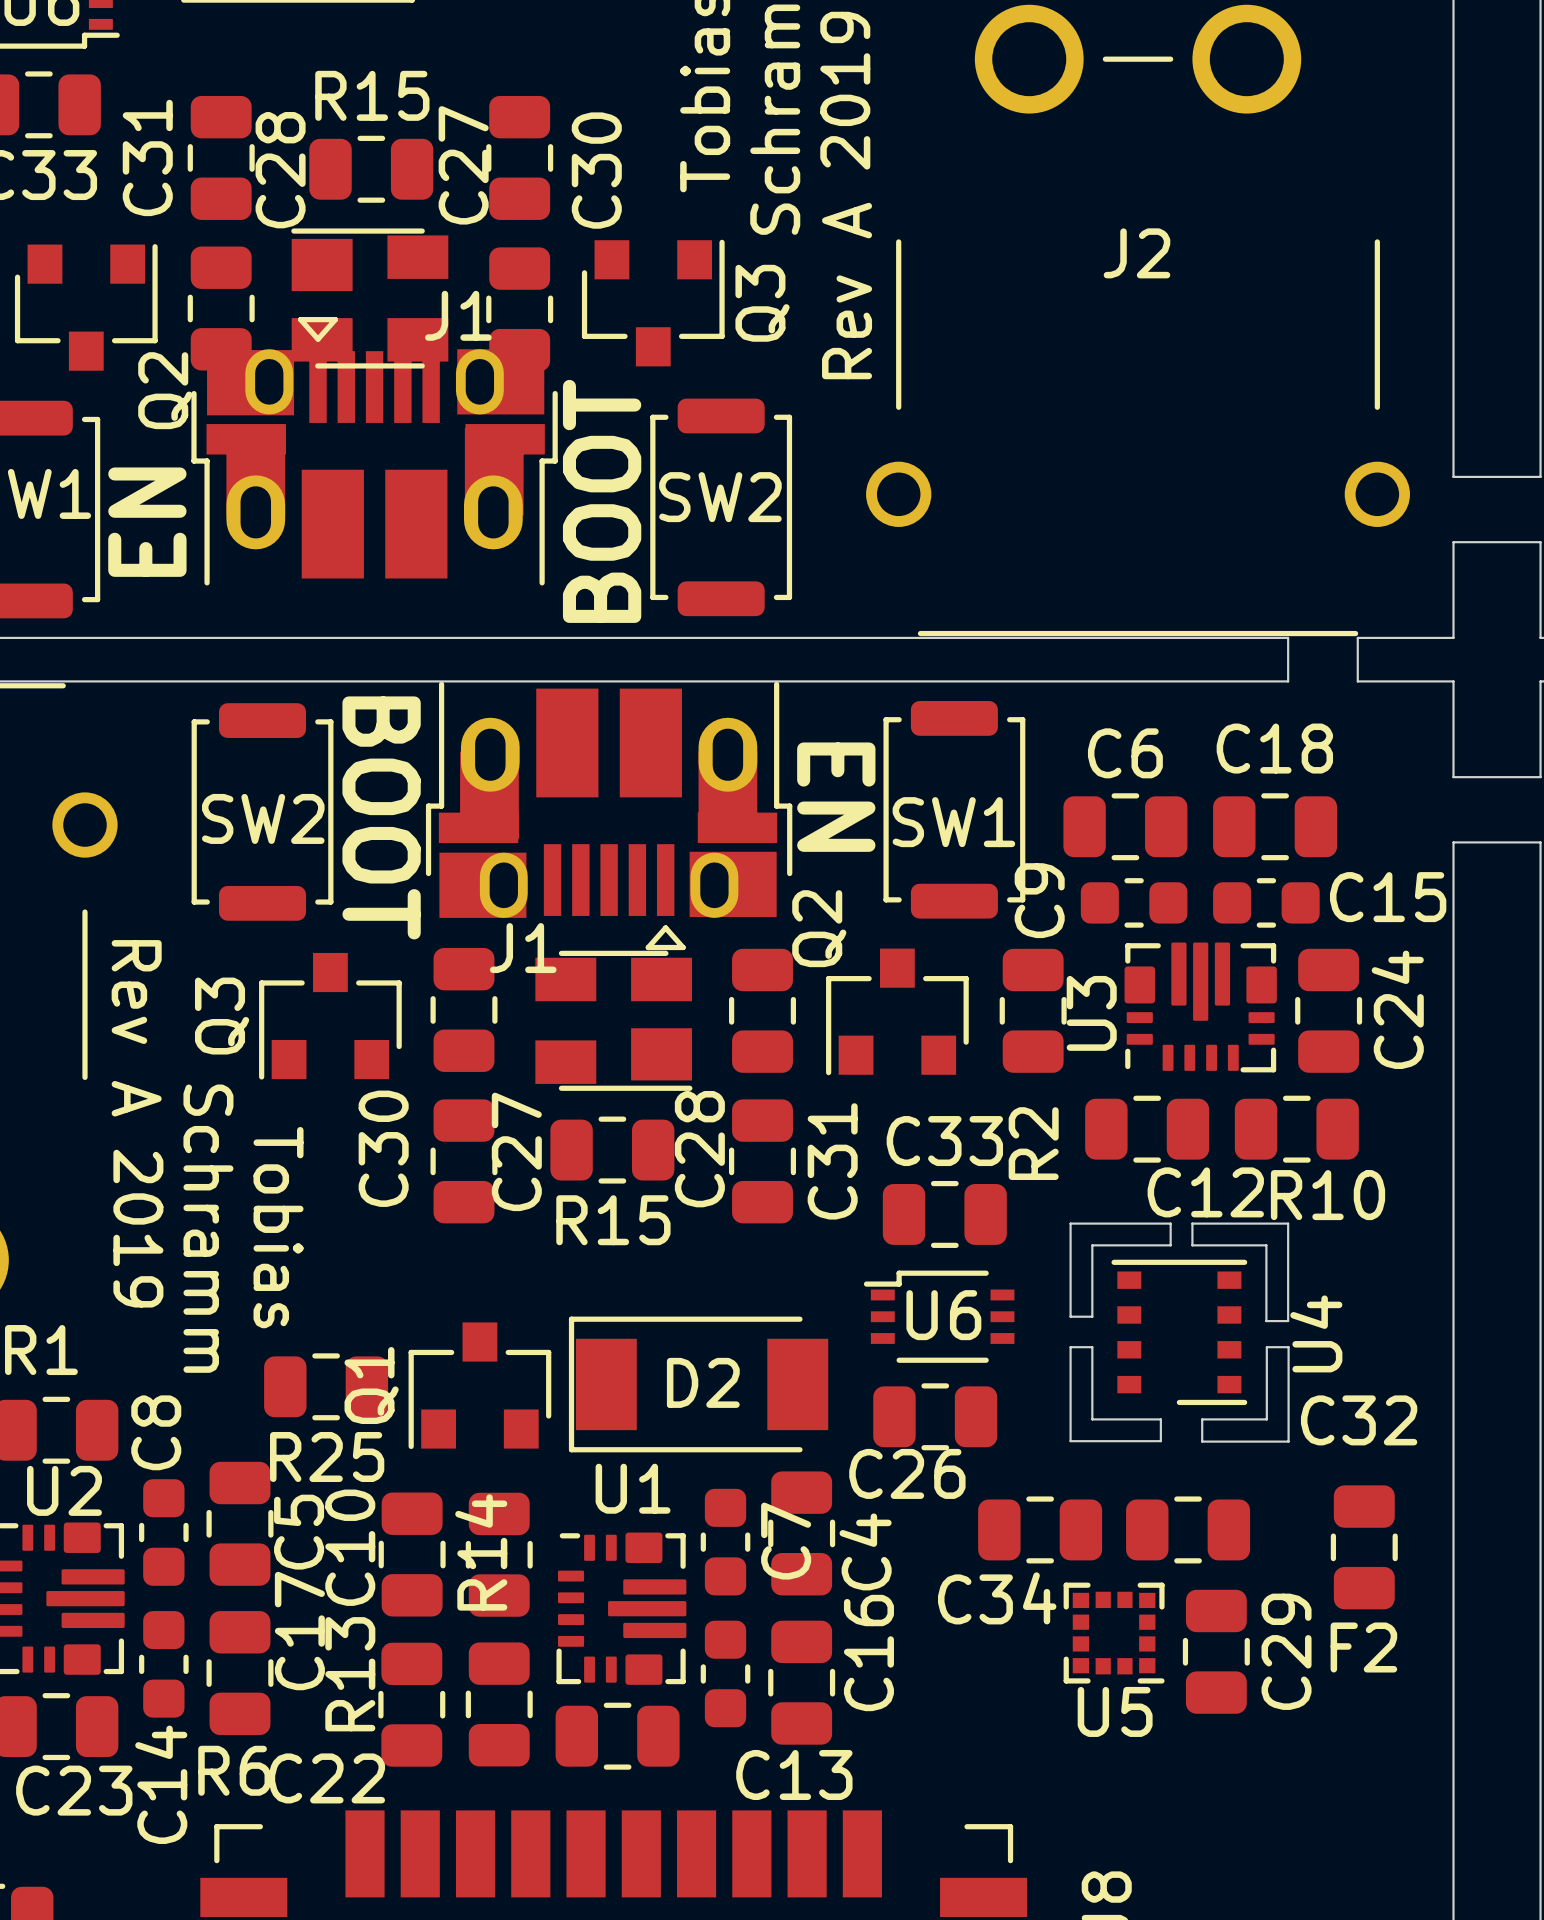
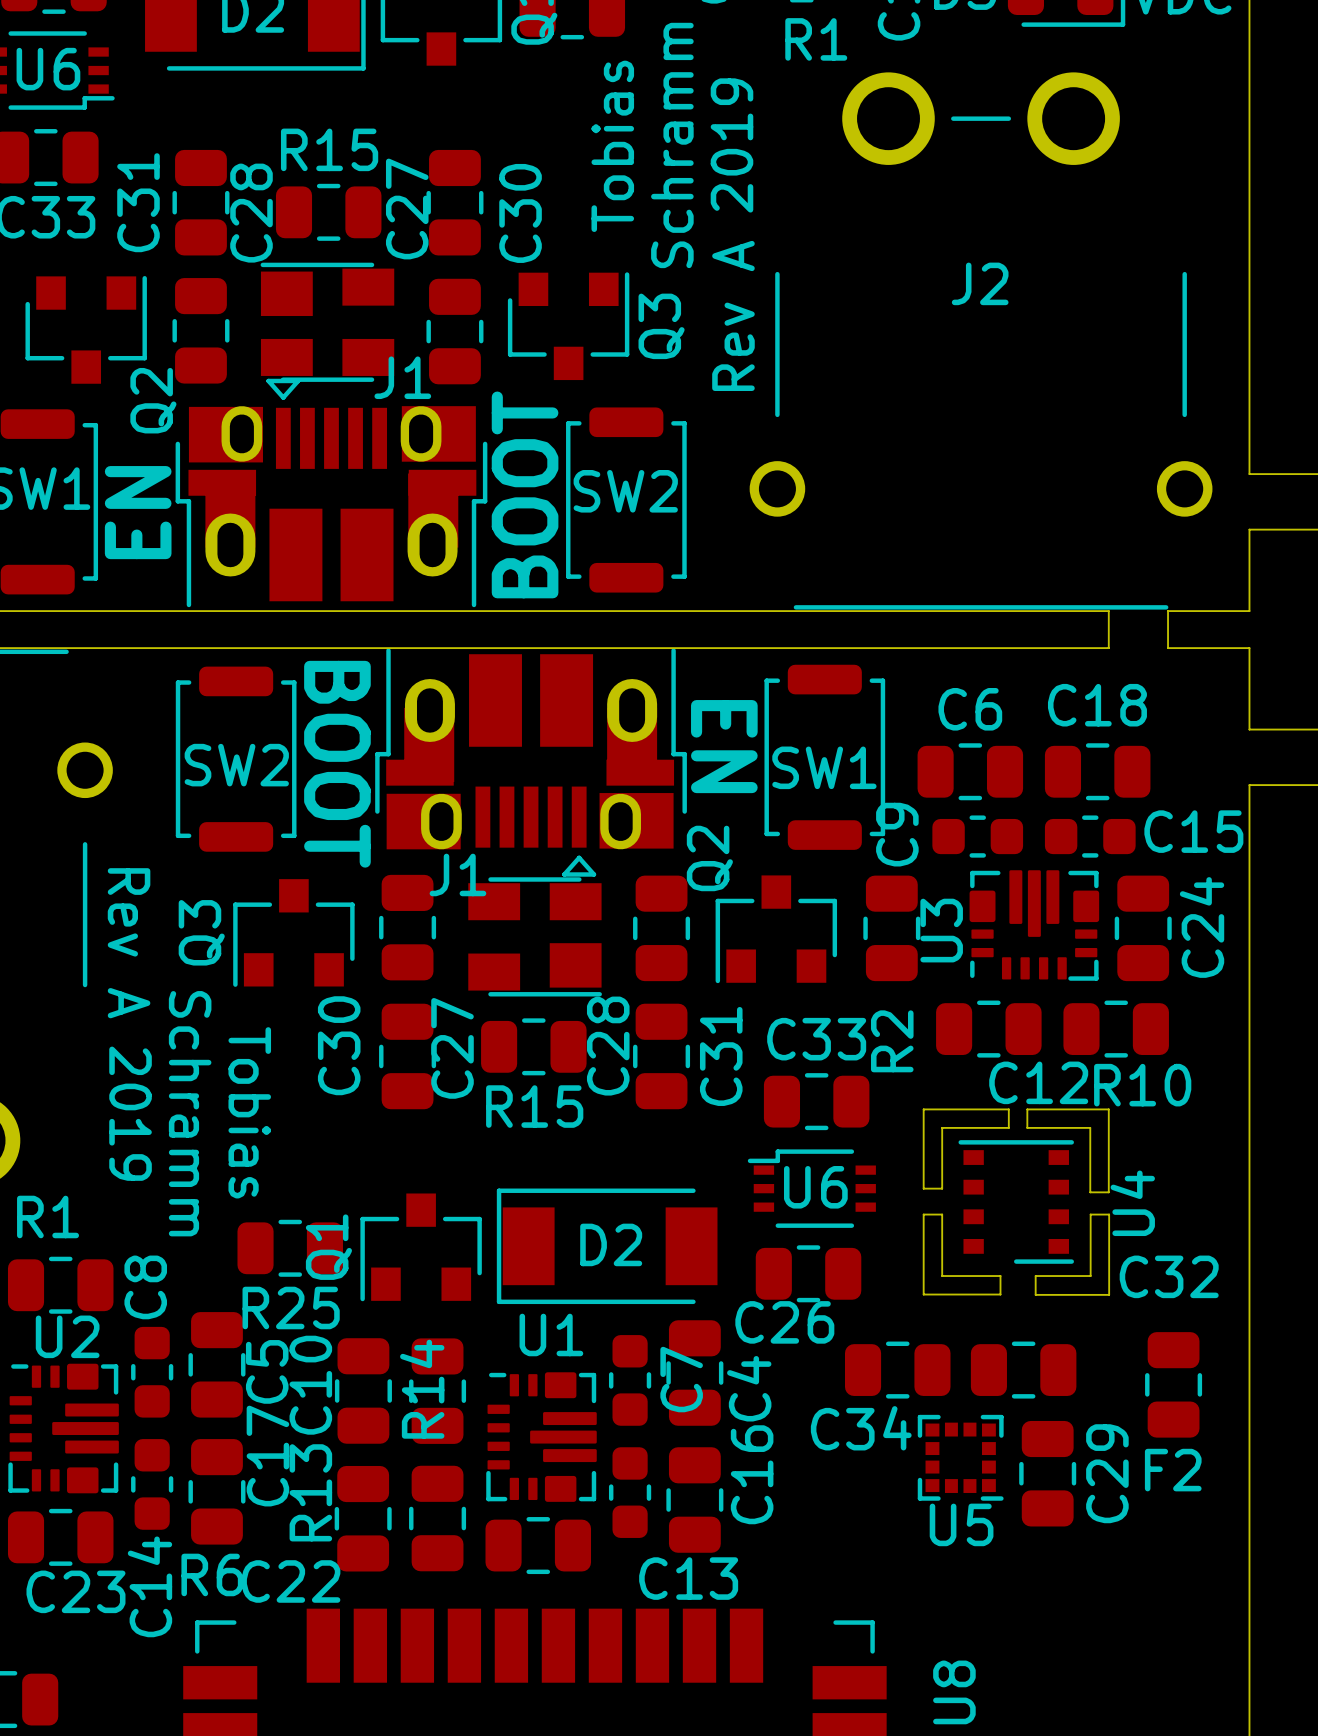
J1 position: (374, 451) -> (331, 492)

